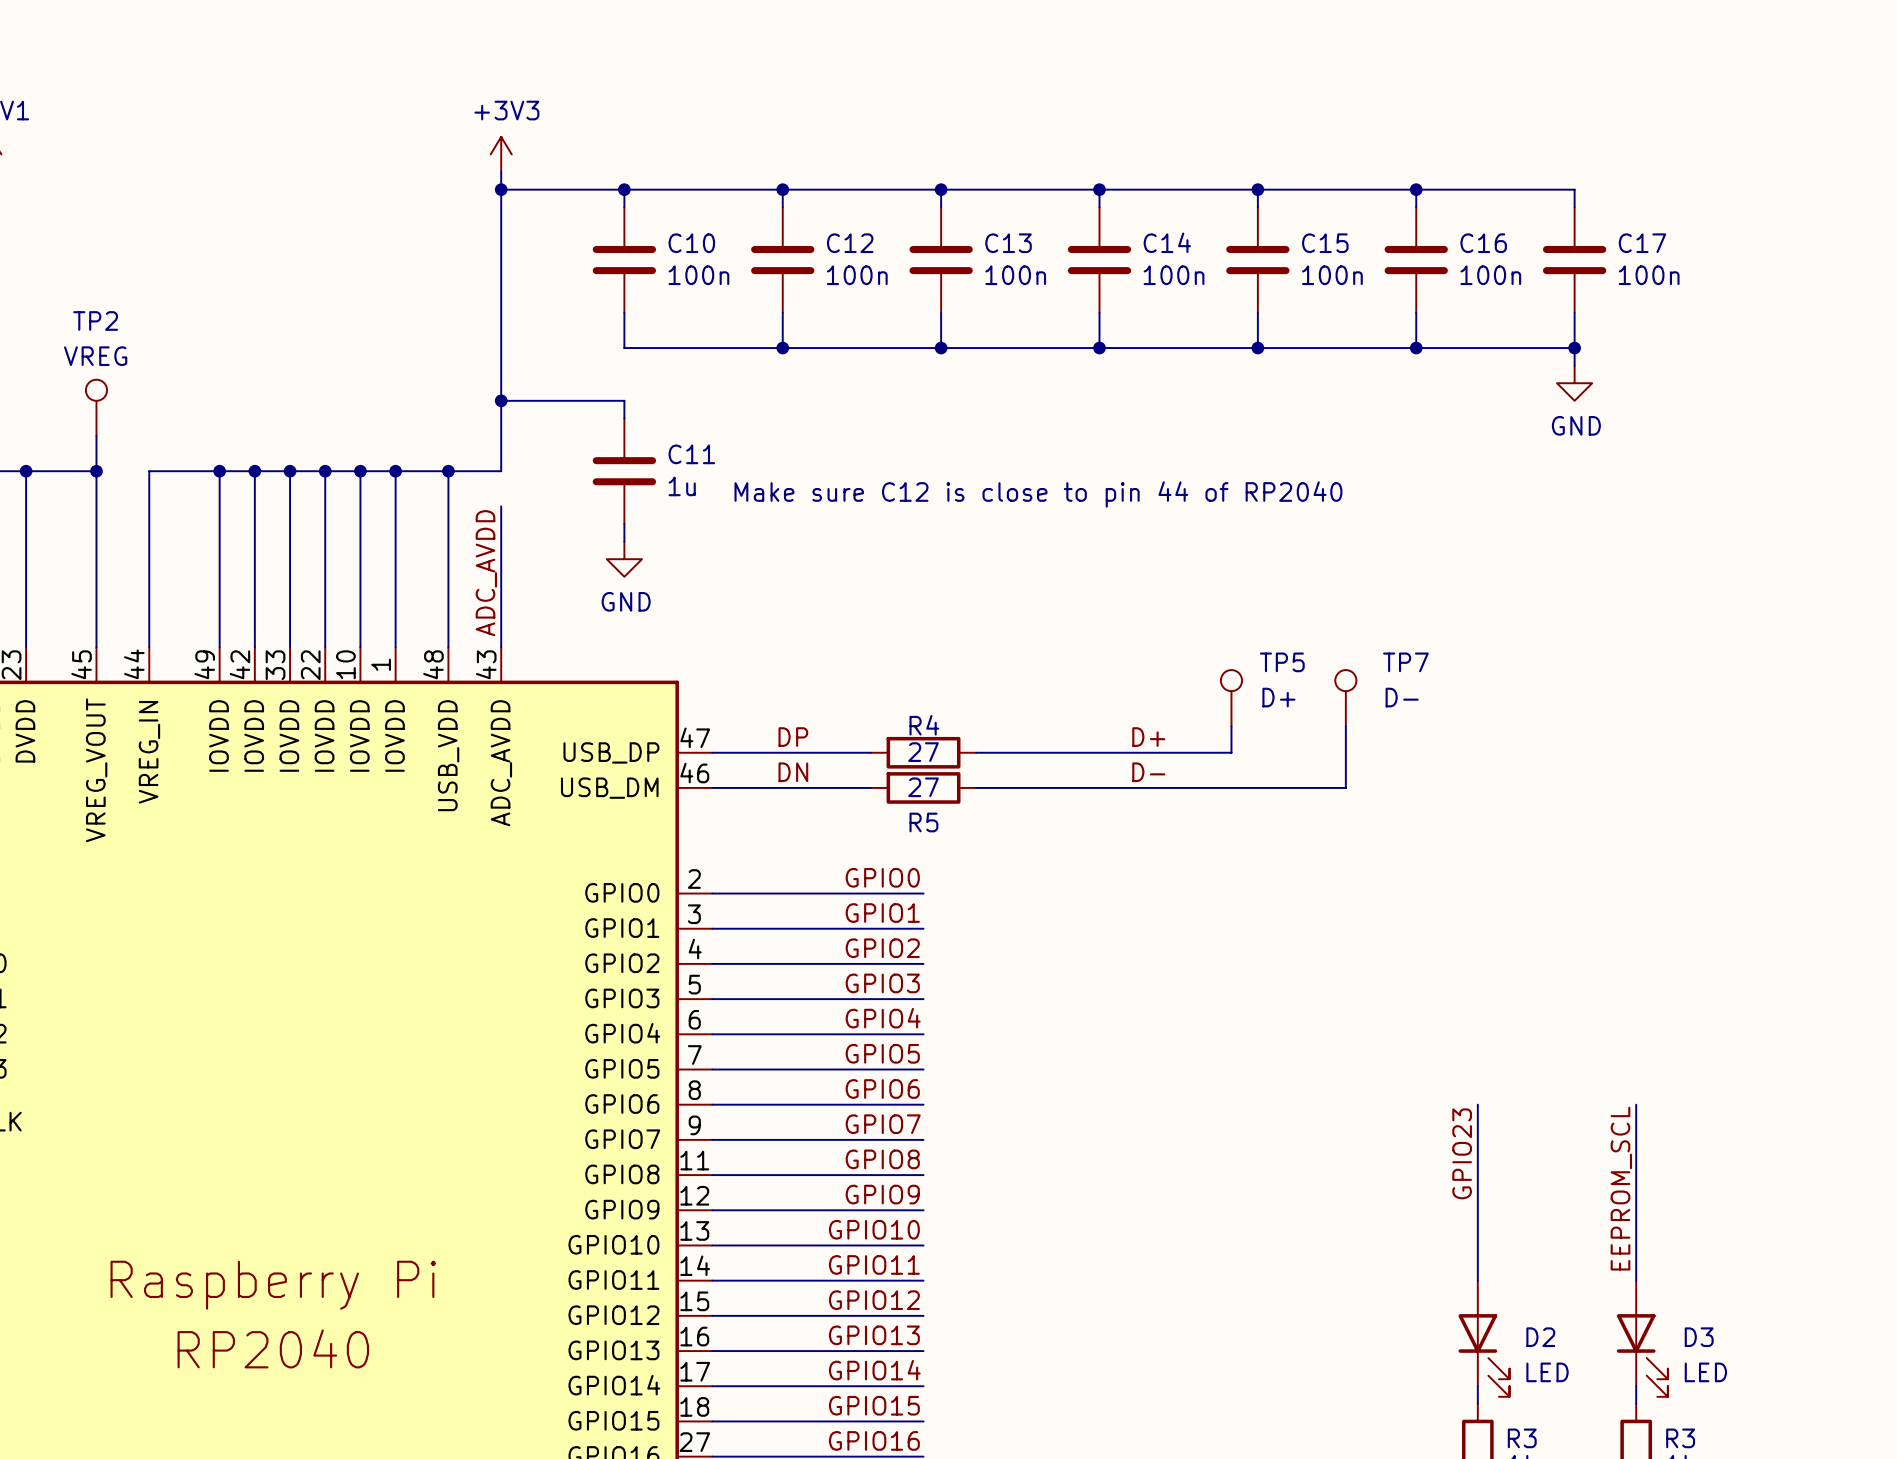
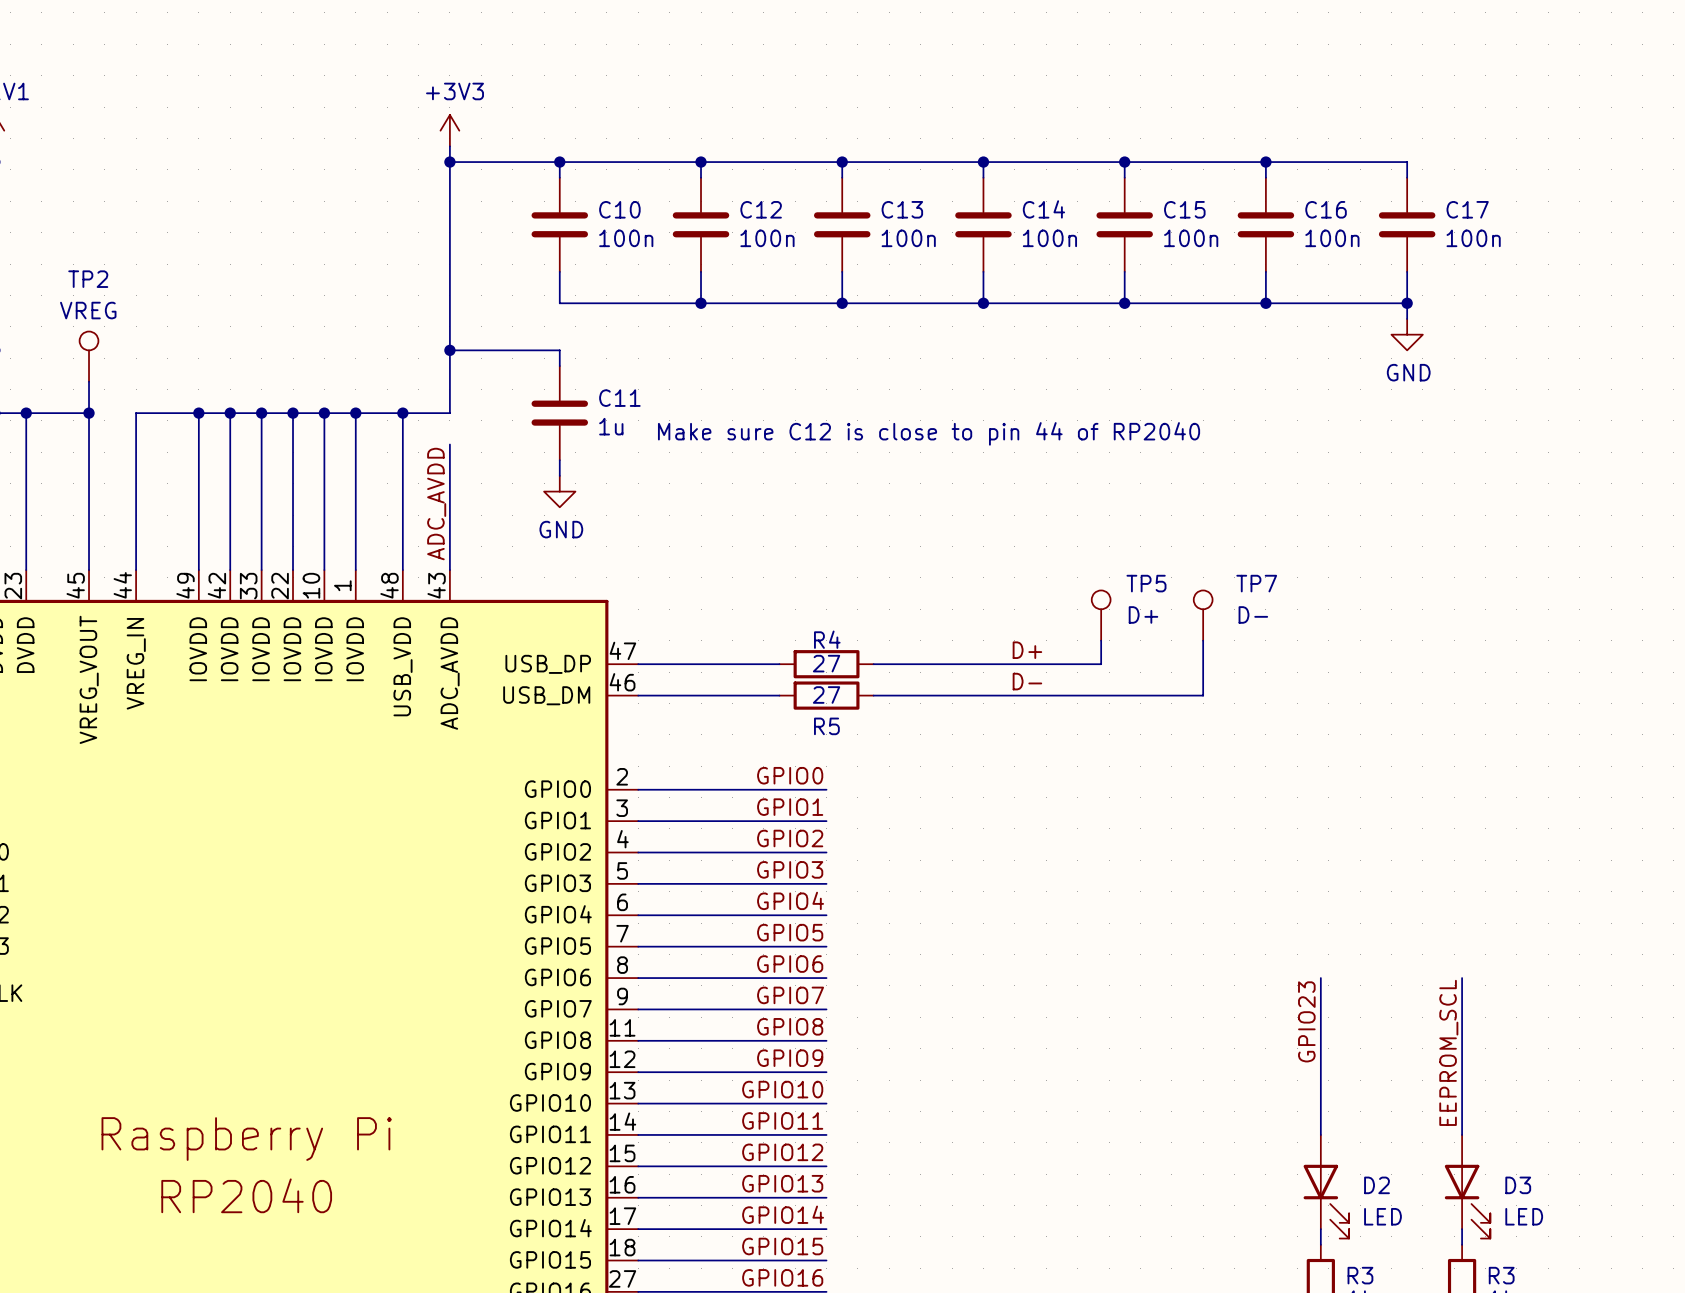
label: DP (793, 737) -> none
label: DN (793, 772) -> none

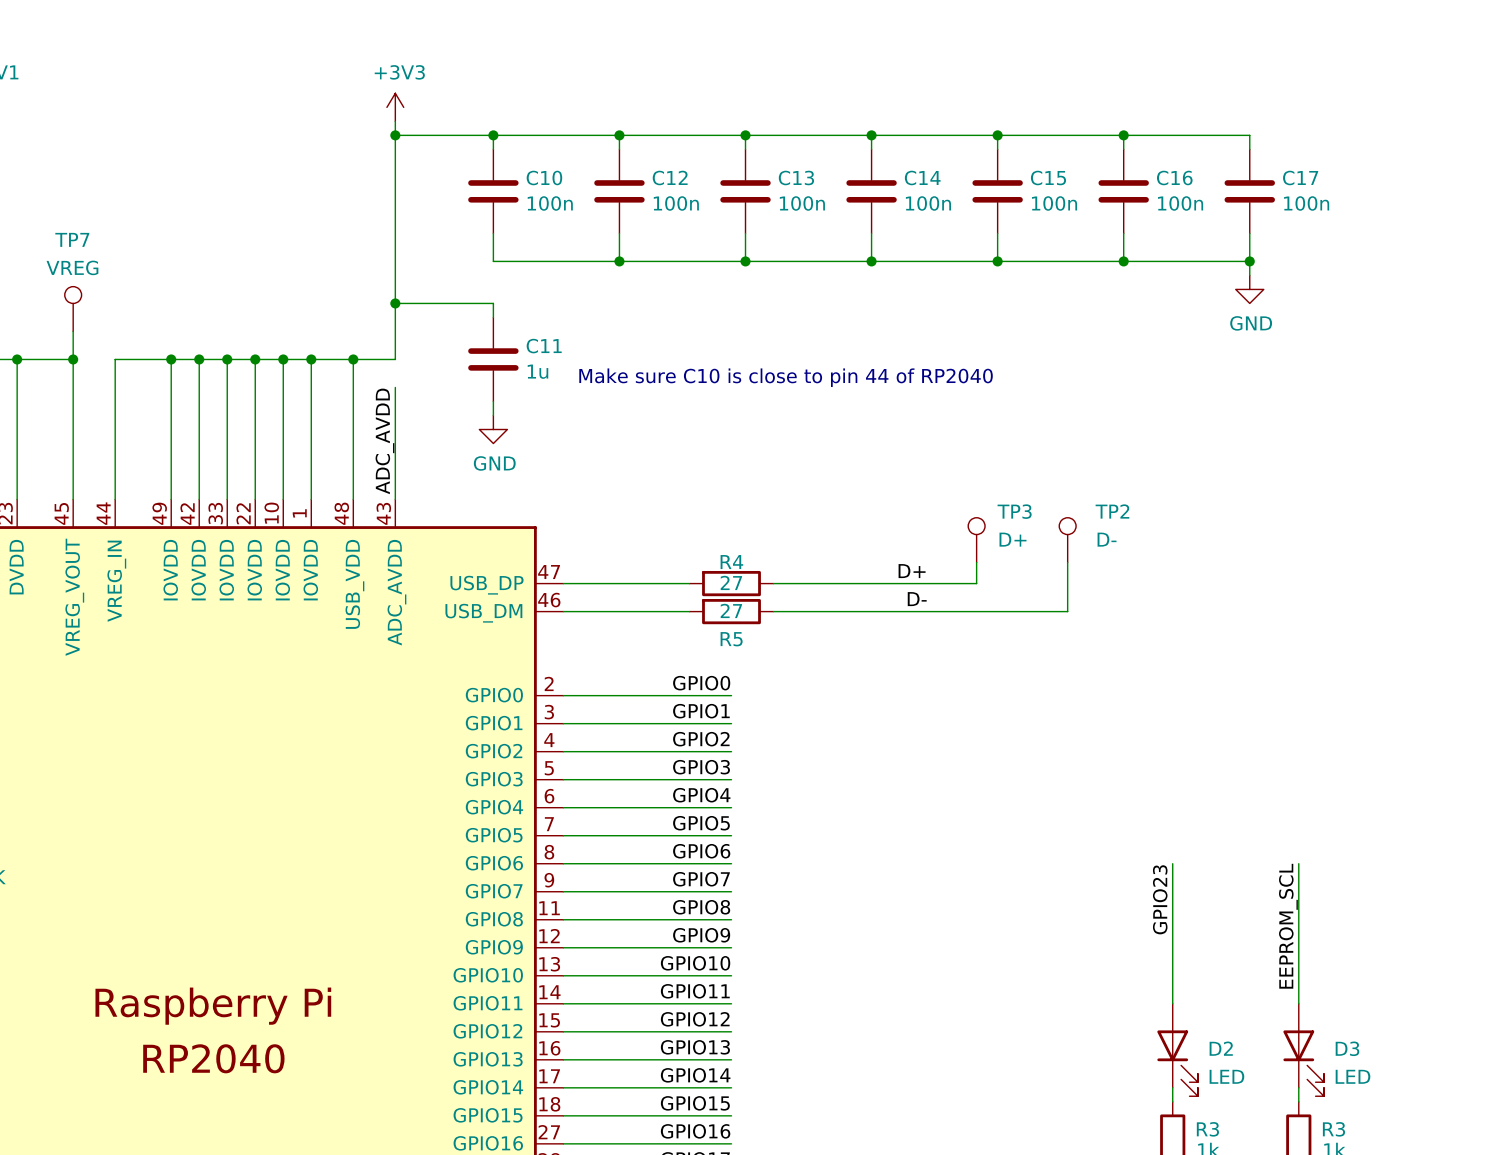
TP2 name: TP2 (88, 279) -> TP7 (72, 239)
text: Make sure C12 is close to pin 44 of RP2040 (929, 433) -> Make sure C10 is close to pin 44 of RP2040 (786, 377)
TP5 name: TP5 (1146, 583) -> TP3 (1014, 511)
TP7 name: TP7 (1256, 583) -> TP2 (1112, 511)

